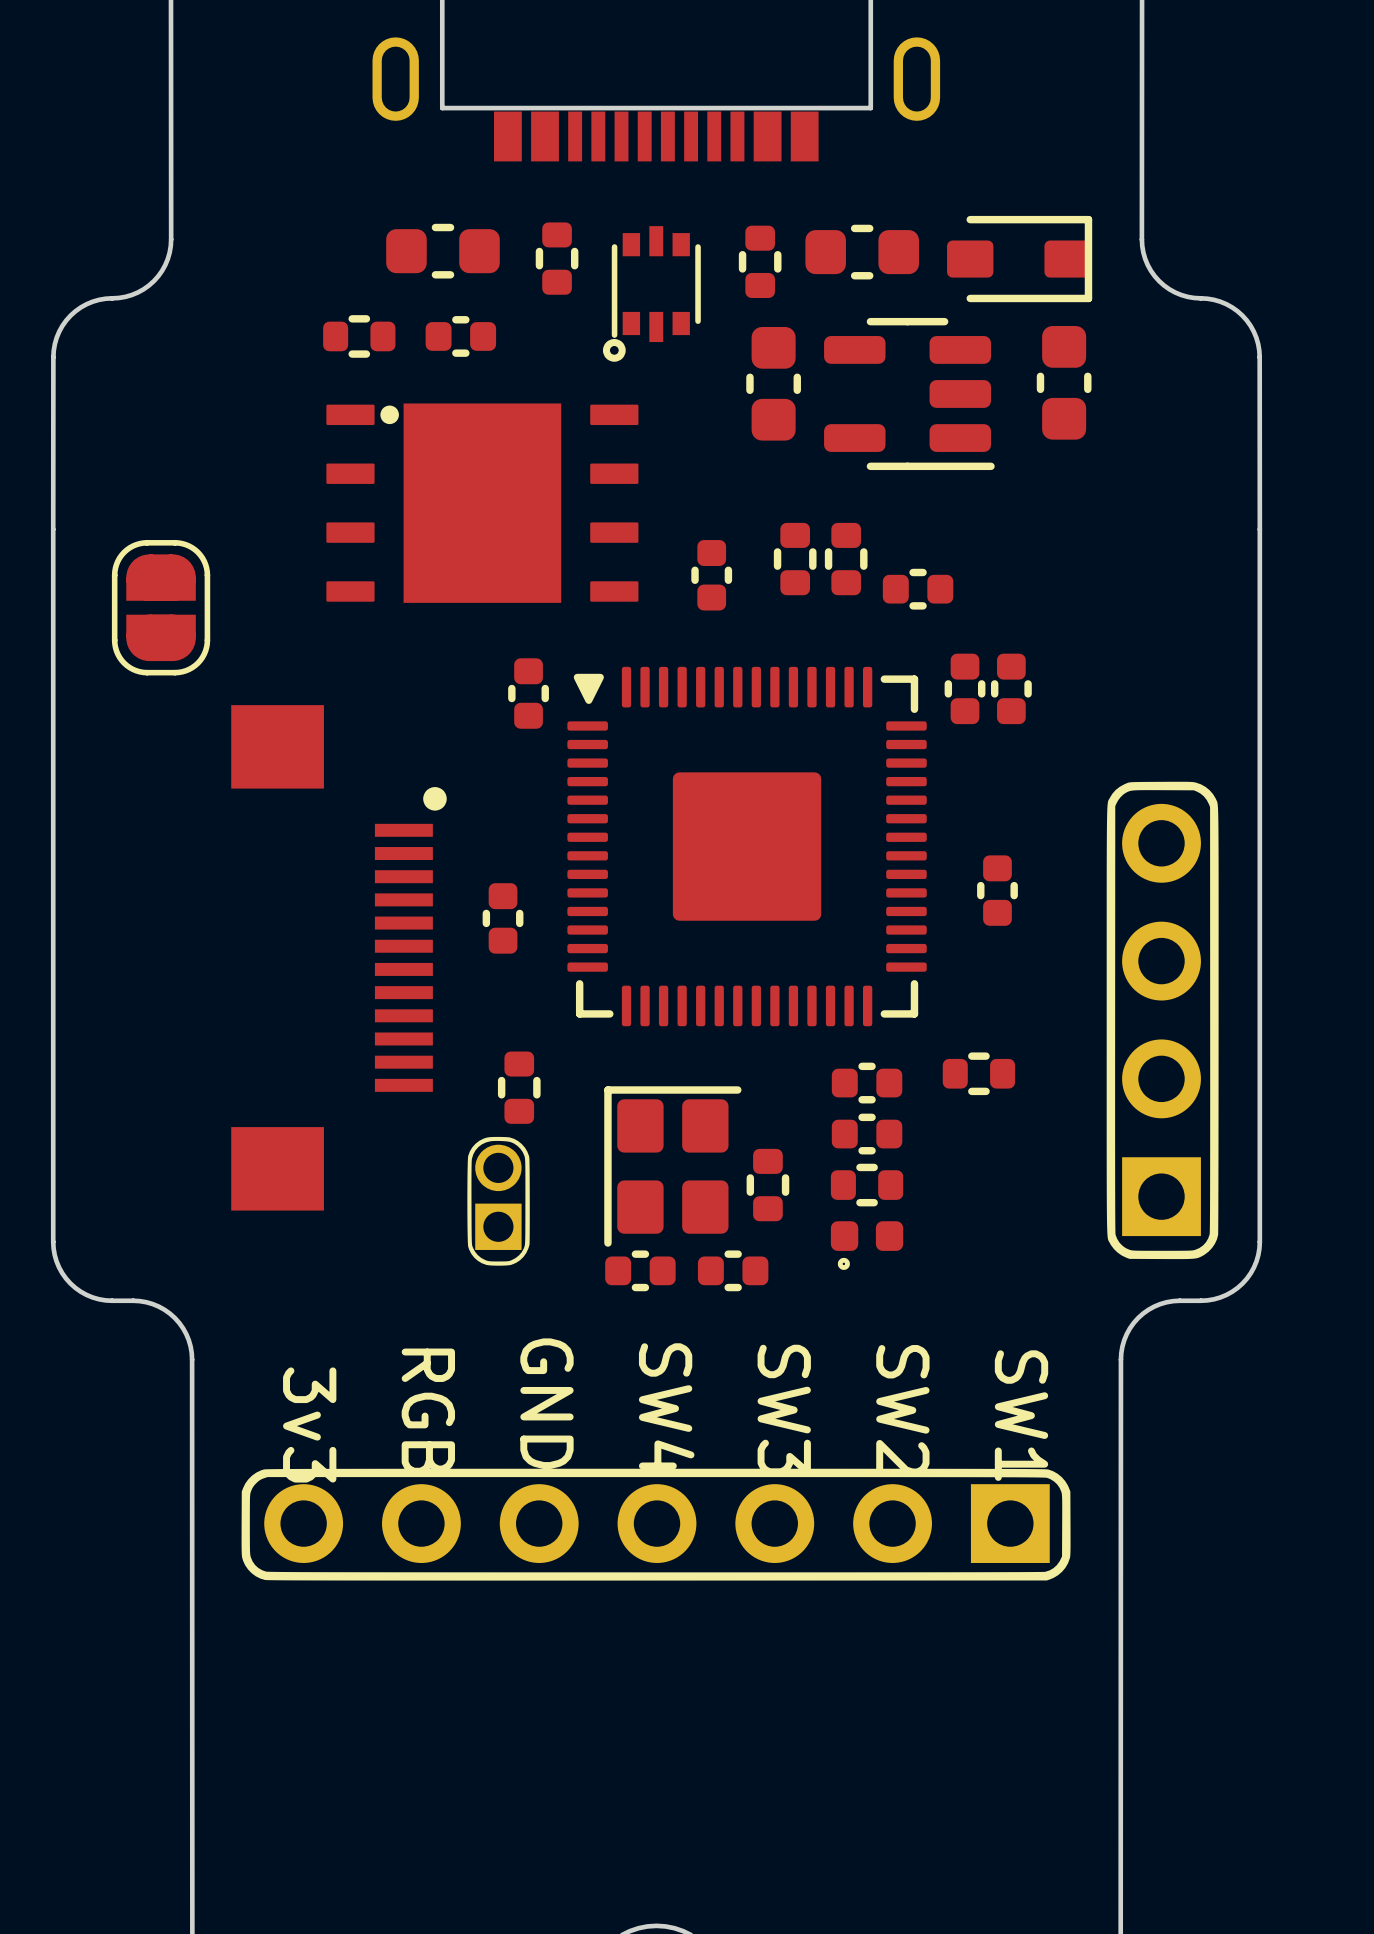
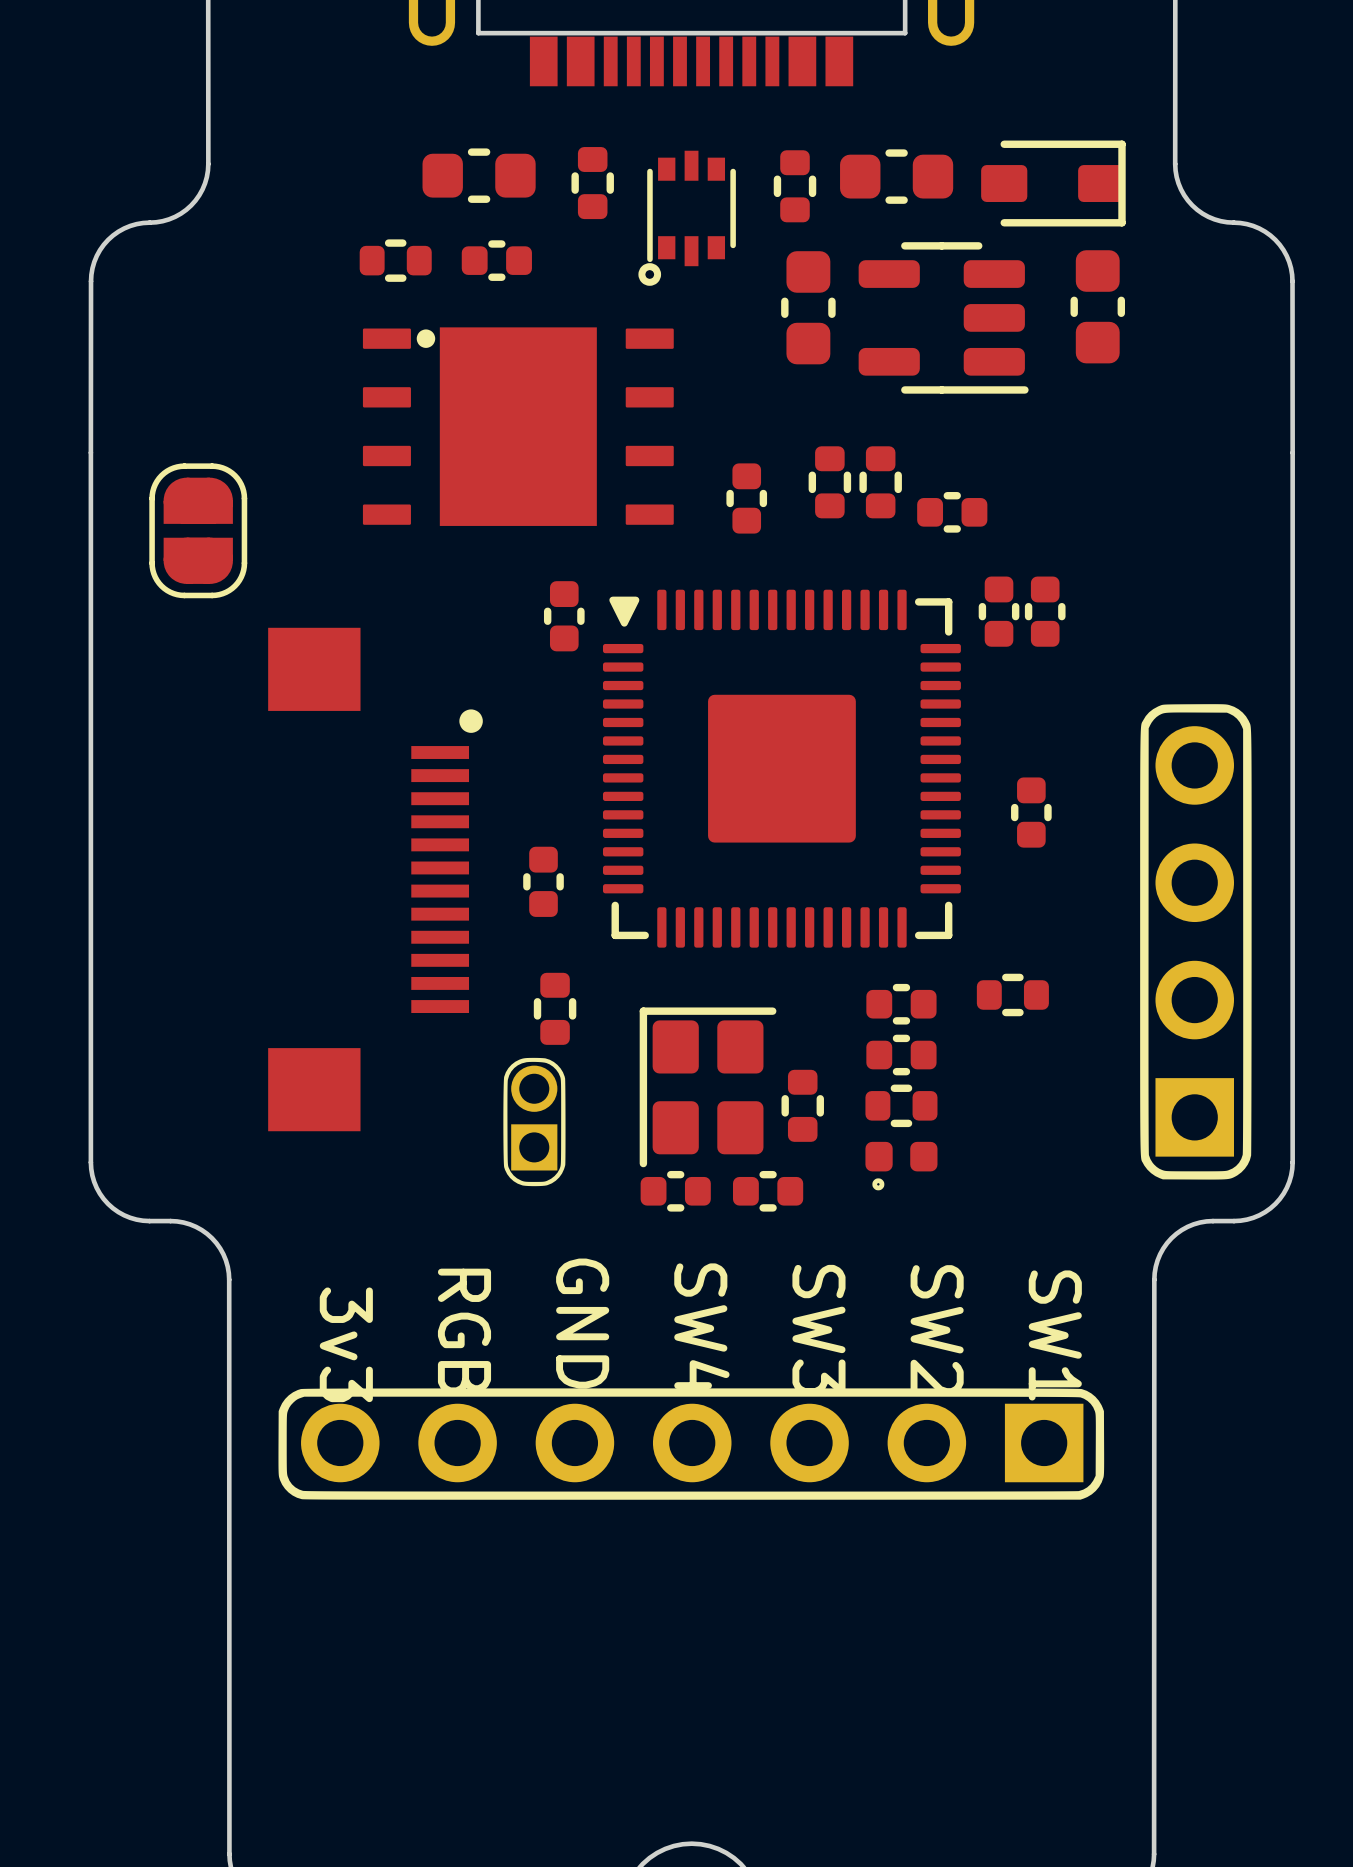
part position: (503, 918) -> (543, 881)

